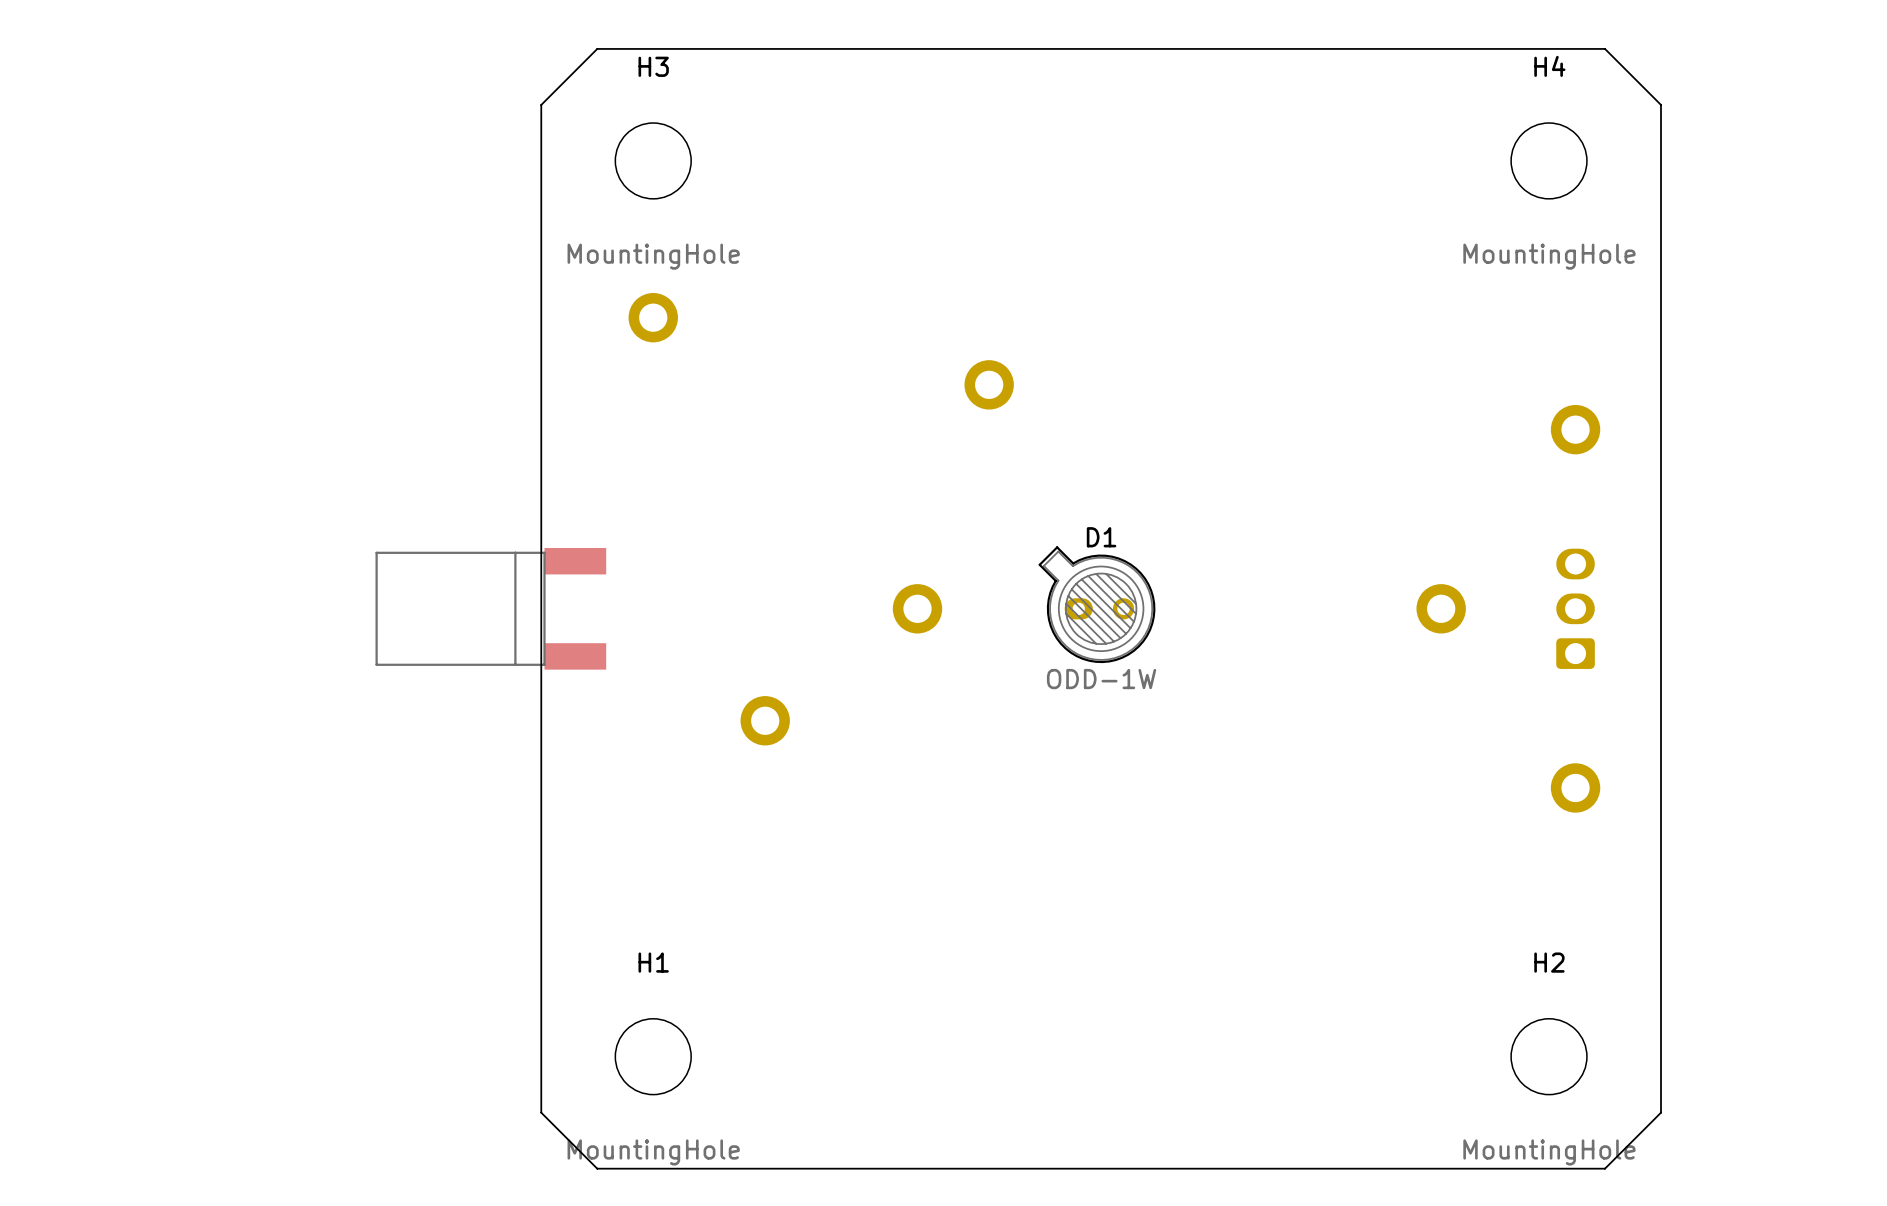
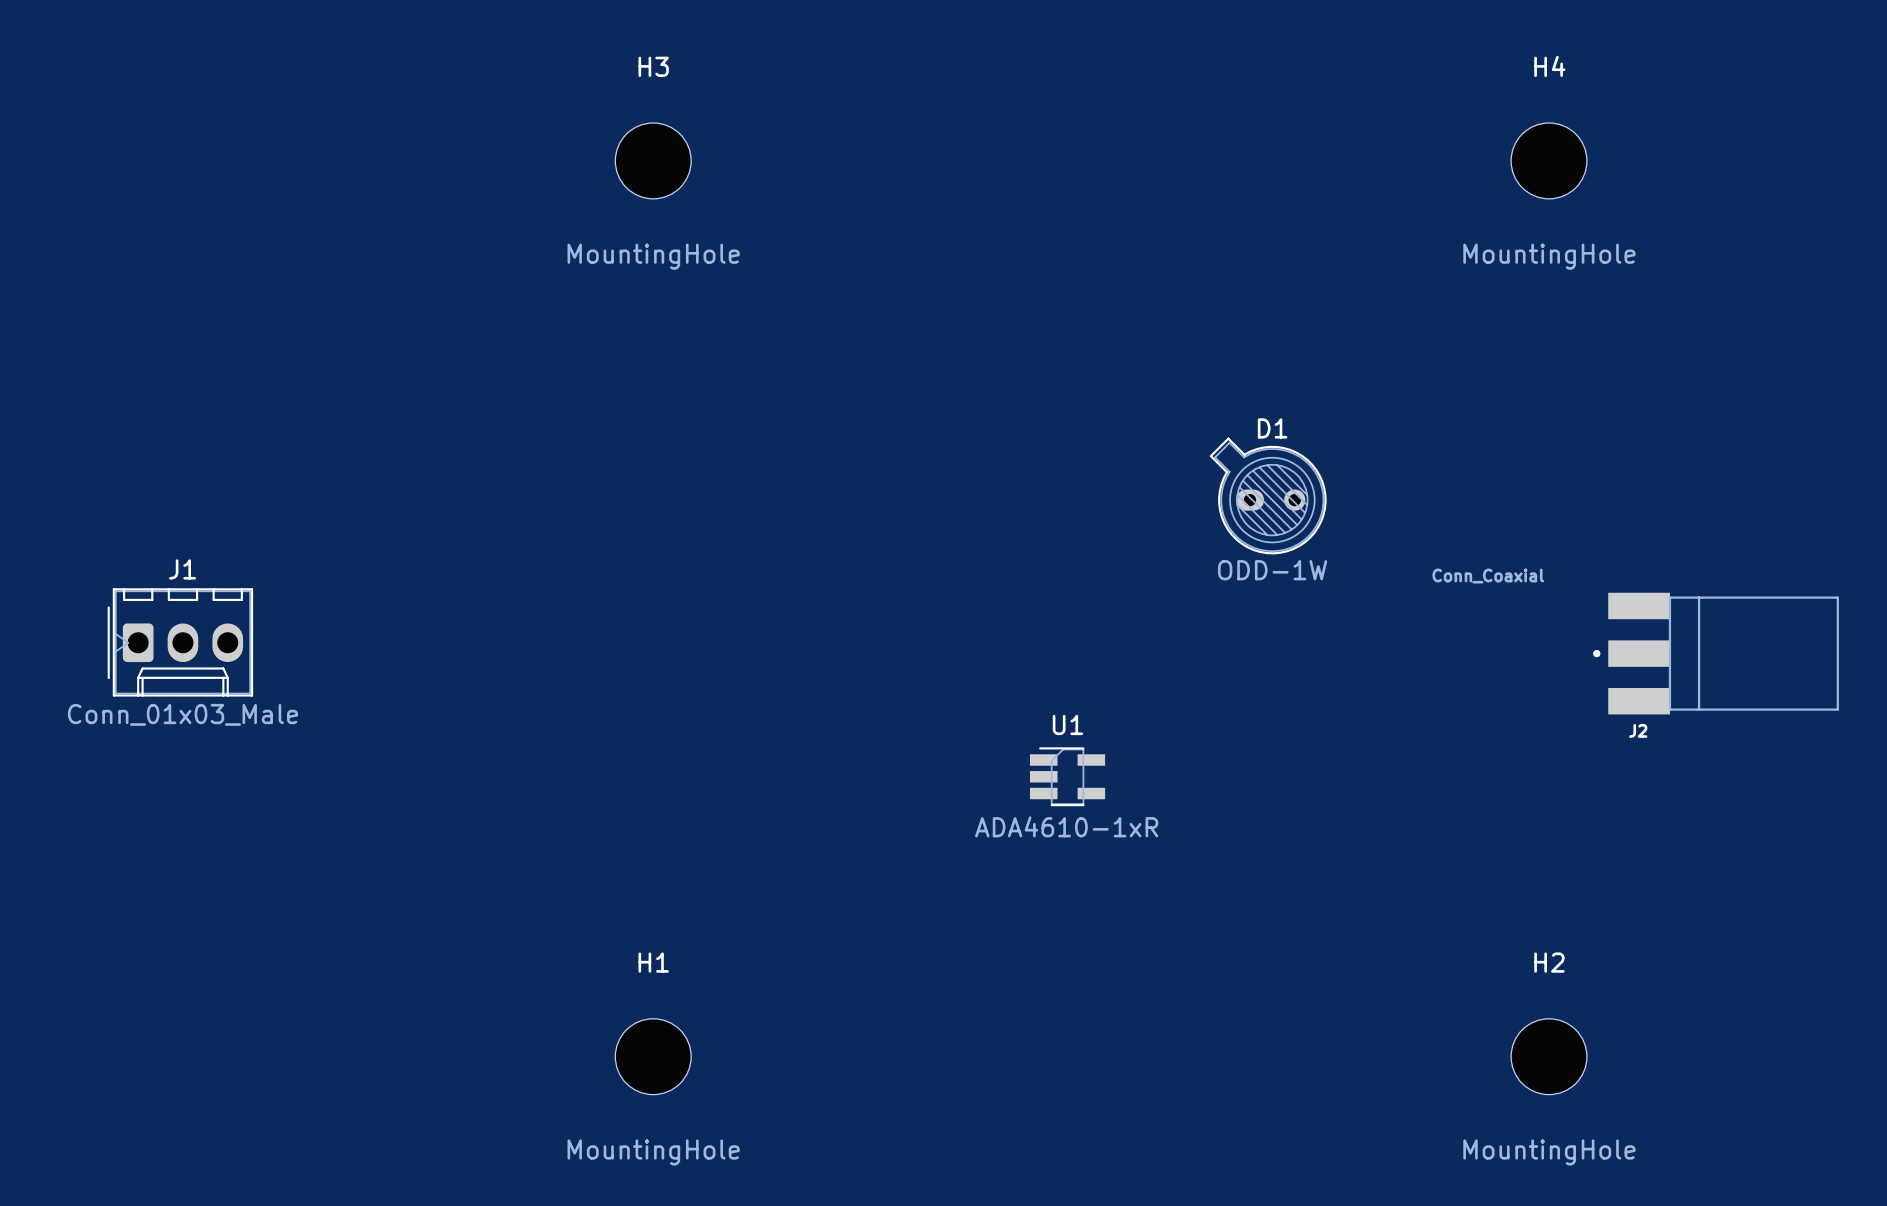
board edge: (597, 48) (1605, 48) (1661, 104) (1661, 1112) (1605, 1168) (597, 1168) (541, 1112) (541, 104) (597, 48) -> none
part: (653, 317) -> none
part: (989, 384) -> none
part: (1575, 429) -> none
D1 position: (1097, 604) -> (1268, 495)
part: (490, 608) -> none
part: (917, 608) -> none
part: (1441, 608) -> none
part: (1575, 608) -> none
J1: none -> Conn_01x03_Male (180, 642)
J2: none -> Conn_Coaxial (1716, 653)
part: (765, 720) -> none
U1: none -> ADA4610-1xR (1067, 776)
part: (1575, 787) -> none

